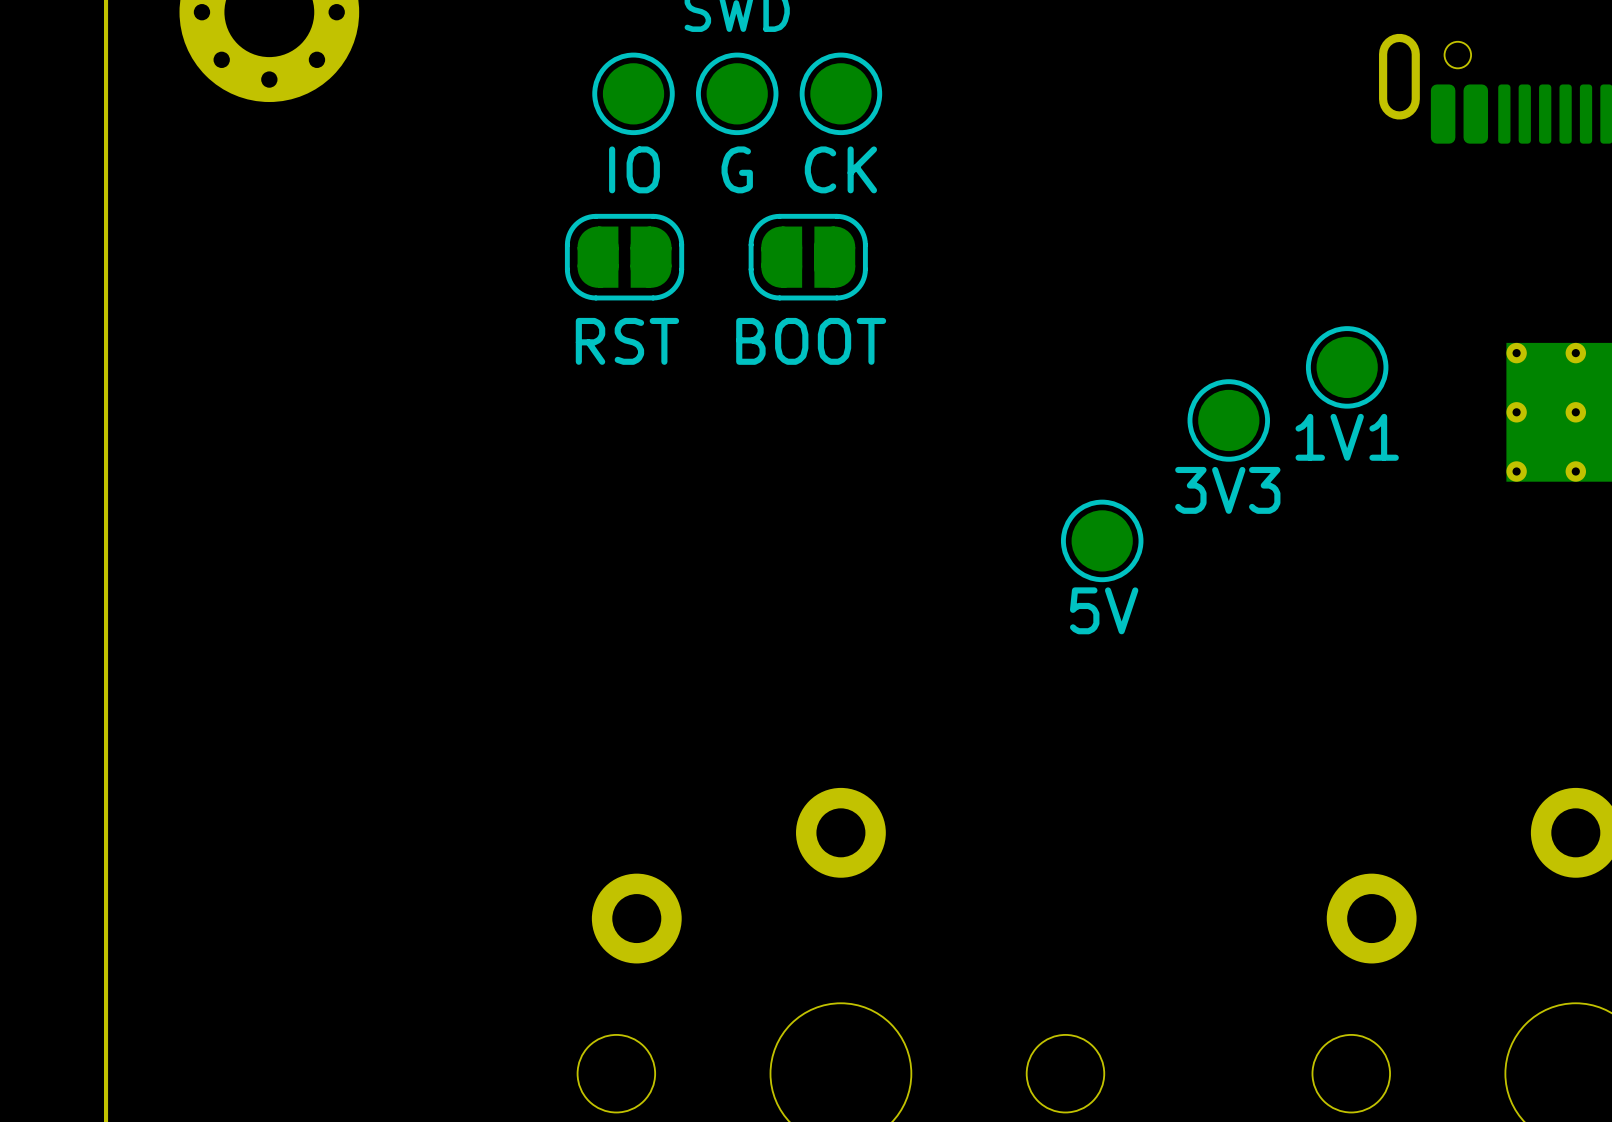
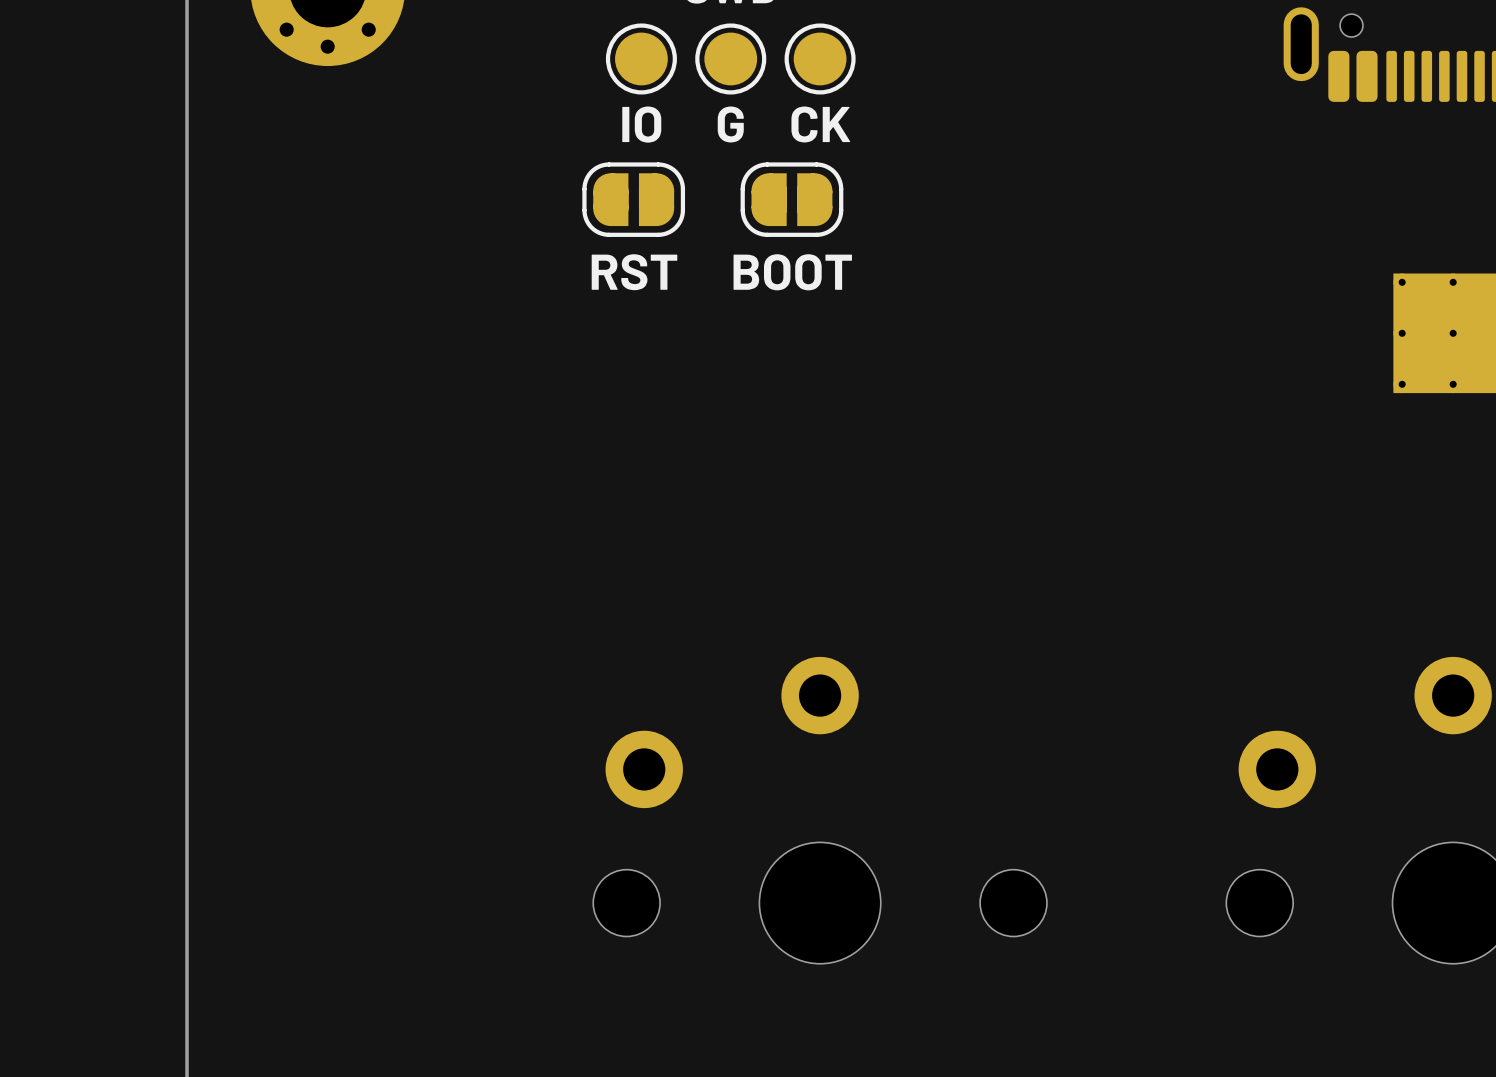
part: (1347, 367) -> none
part: (1228, 420) -> none
text: 1V1 (1347, 437) -> none
text: 3V3 (1227, 490) -> none
part: (1102, 540) -> none
text: 5V (1104, 610) -> none

